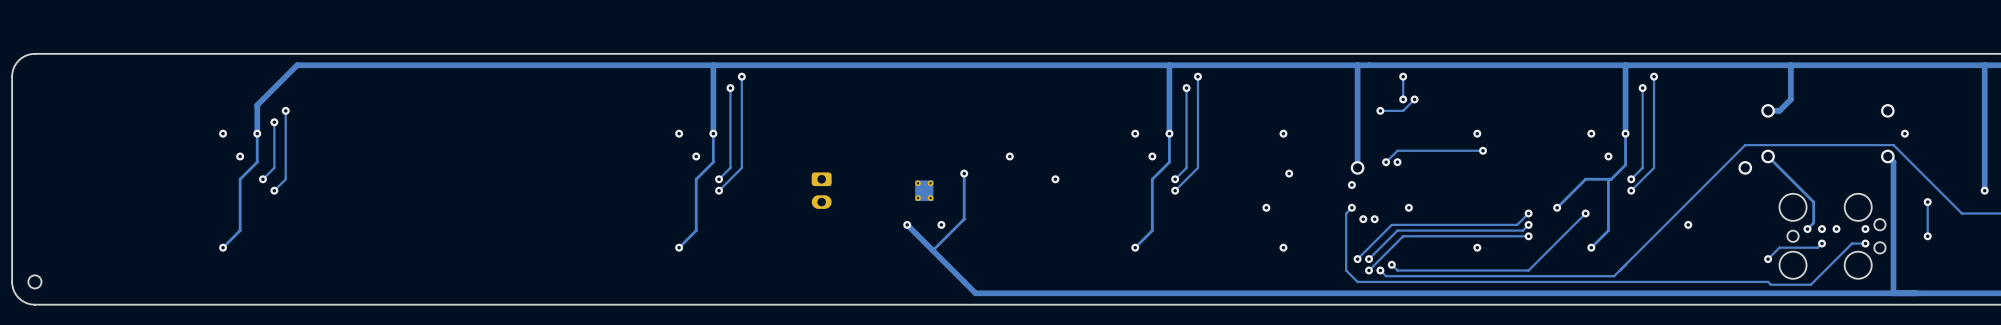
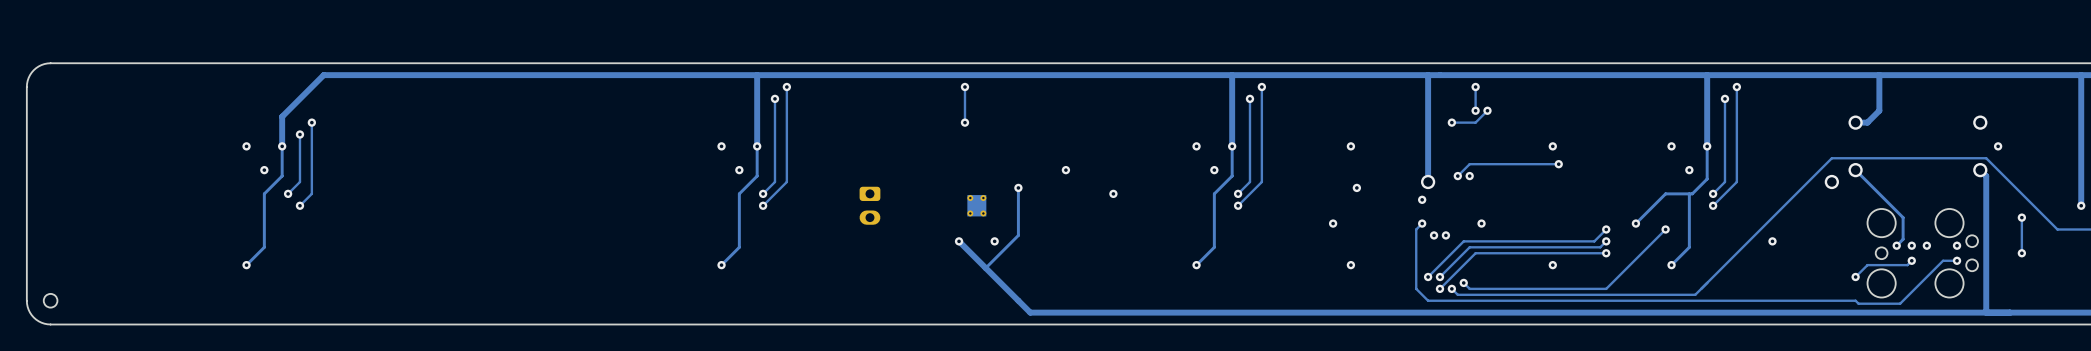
track: none -> (964, 86) (964, 122)
via: none -> (964, 86)
via: none -> (964, 122)

